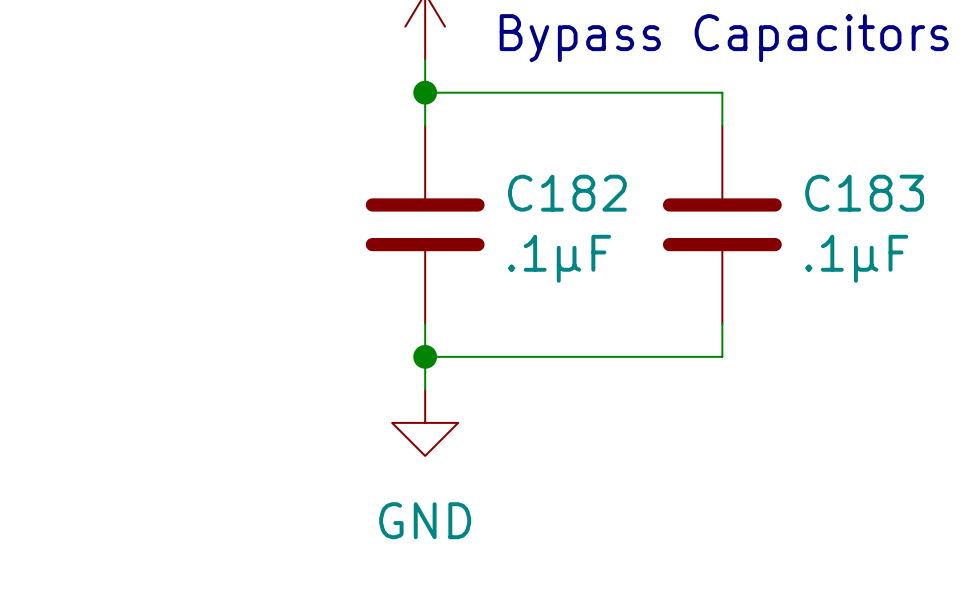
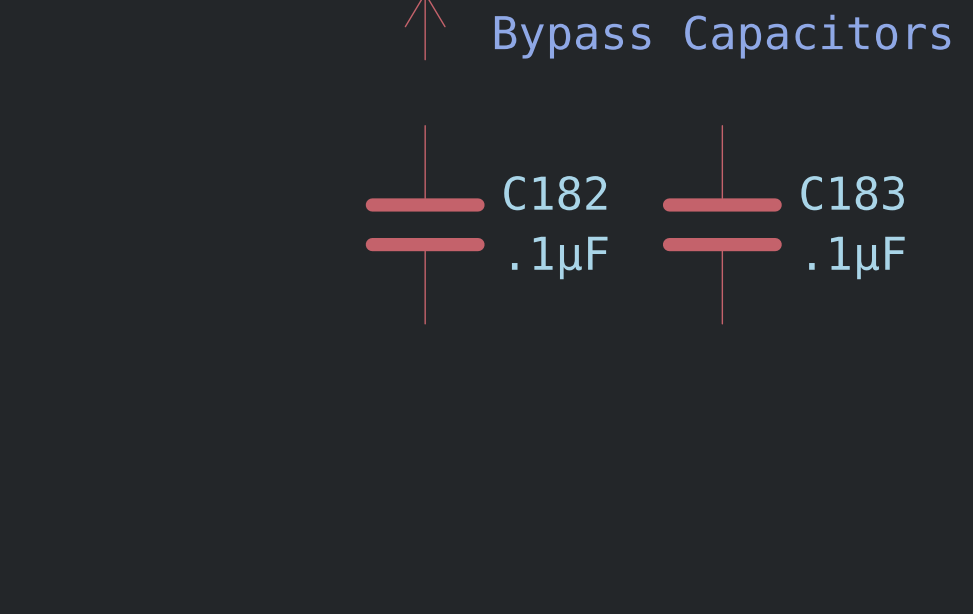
wire: (425, 59) (425, 125) -> none
wire: (425, 92) (722, 92) (722, 125) -> none
junction: (425, 92) -> none
wire: (425, 323) (425, 389) -> none
wire: (722, 323) (722, 356) (425, 356) -> none
junction: (425, 356) -> none
power symbol: GND (425, 422) -> none

